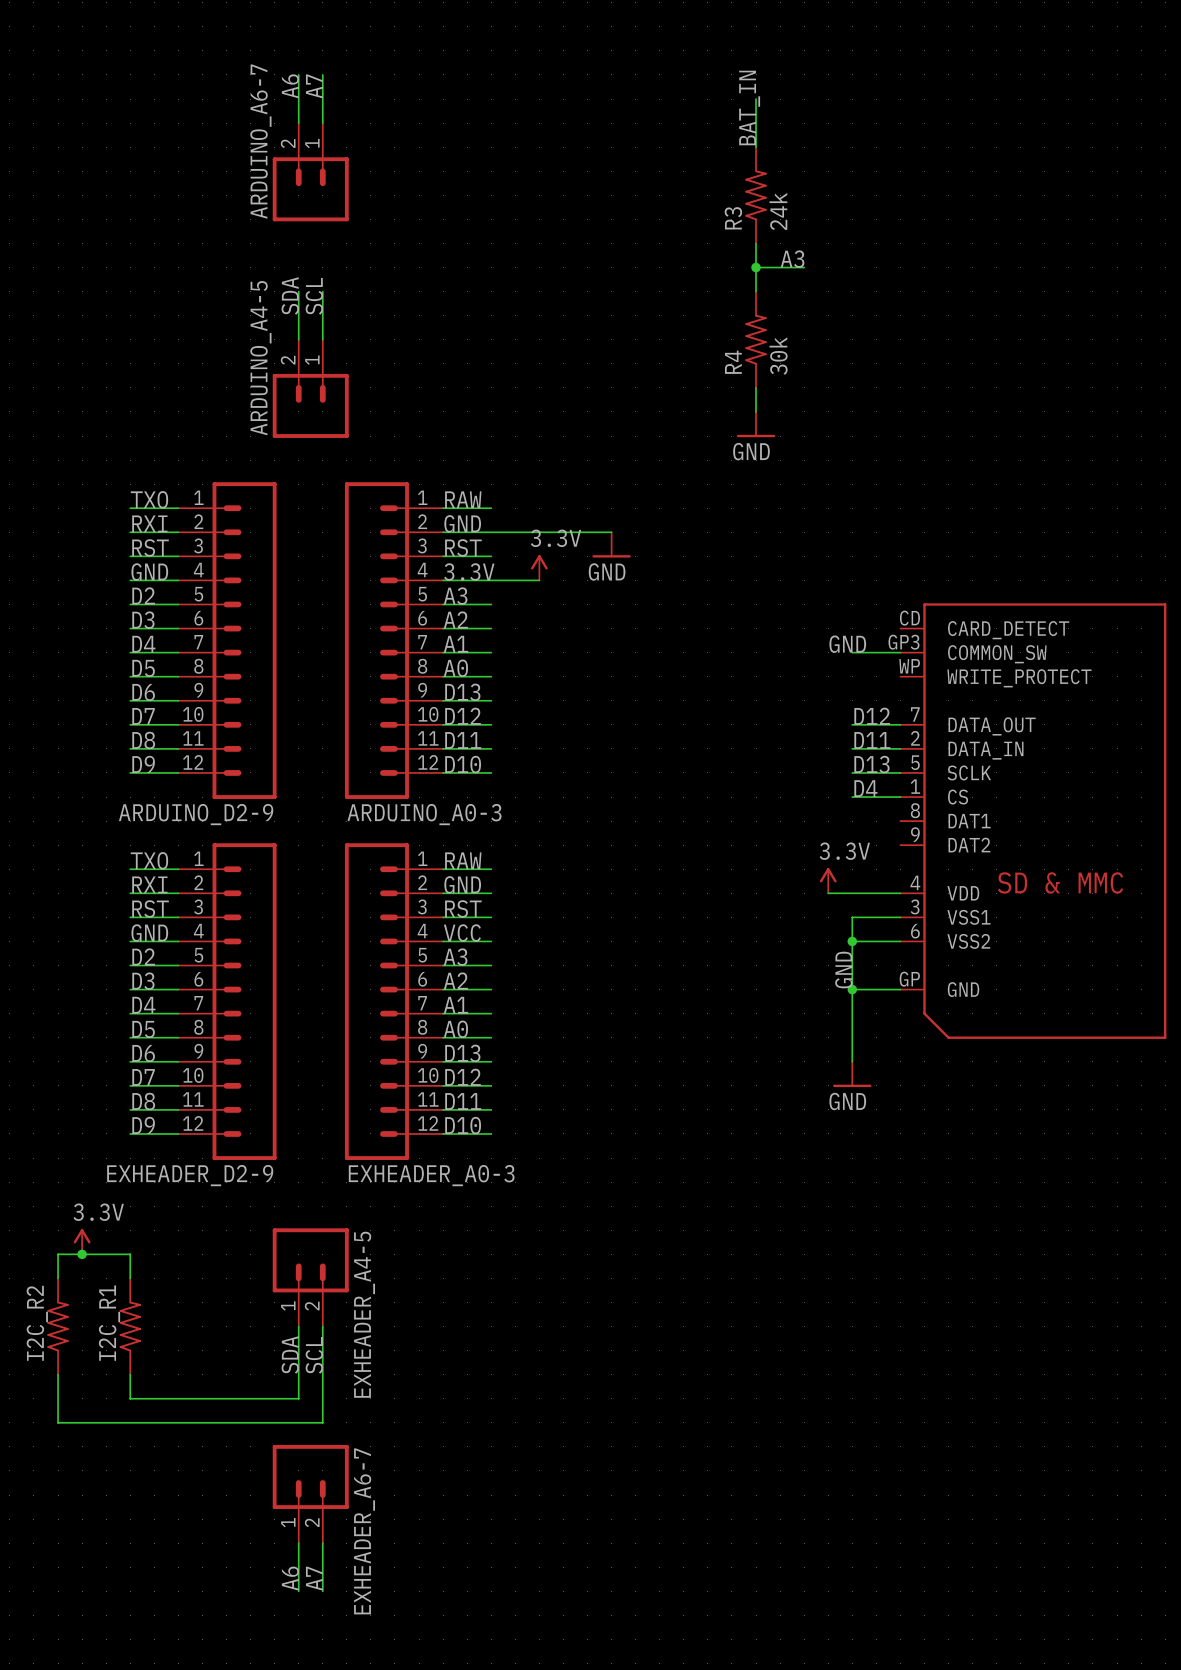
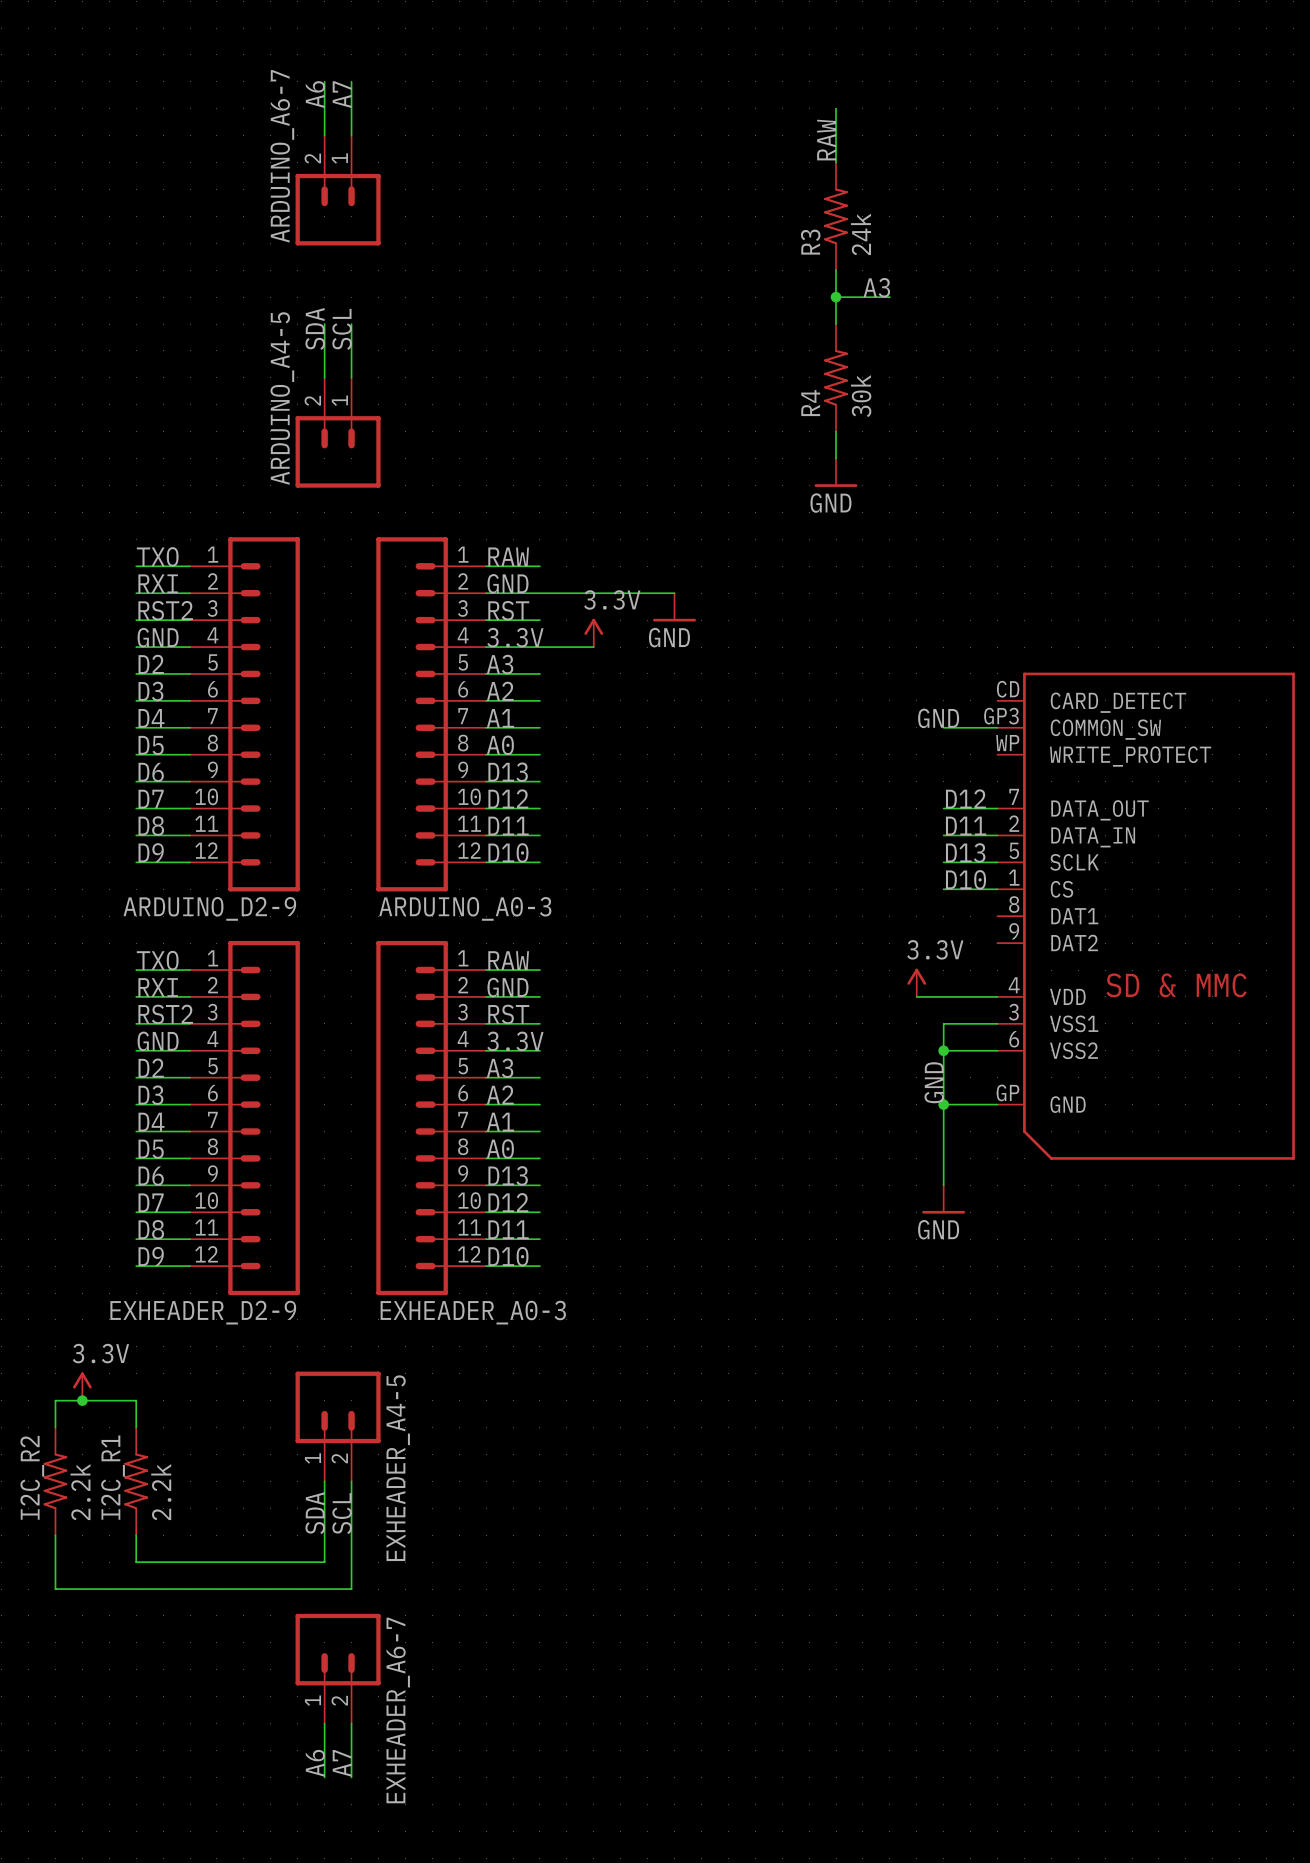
label: BAT_IN (749, 108) -> RAW (826, 140)
label: RST (150, 547) -> RST2 (165, 610)
label: D4 (865, 788) -> D10 (965, 879)
label: RST (150, 908) -> RST2 (165, 1014)
label: VCC (462, 933) -> 3.3V (515, 1041)
I2C_R2 value: none -> 2.2k (80, 1492)
I2C_R1 value: none -> 2.2k (161, 1492)

